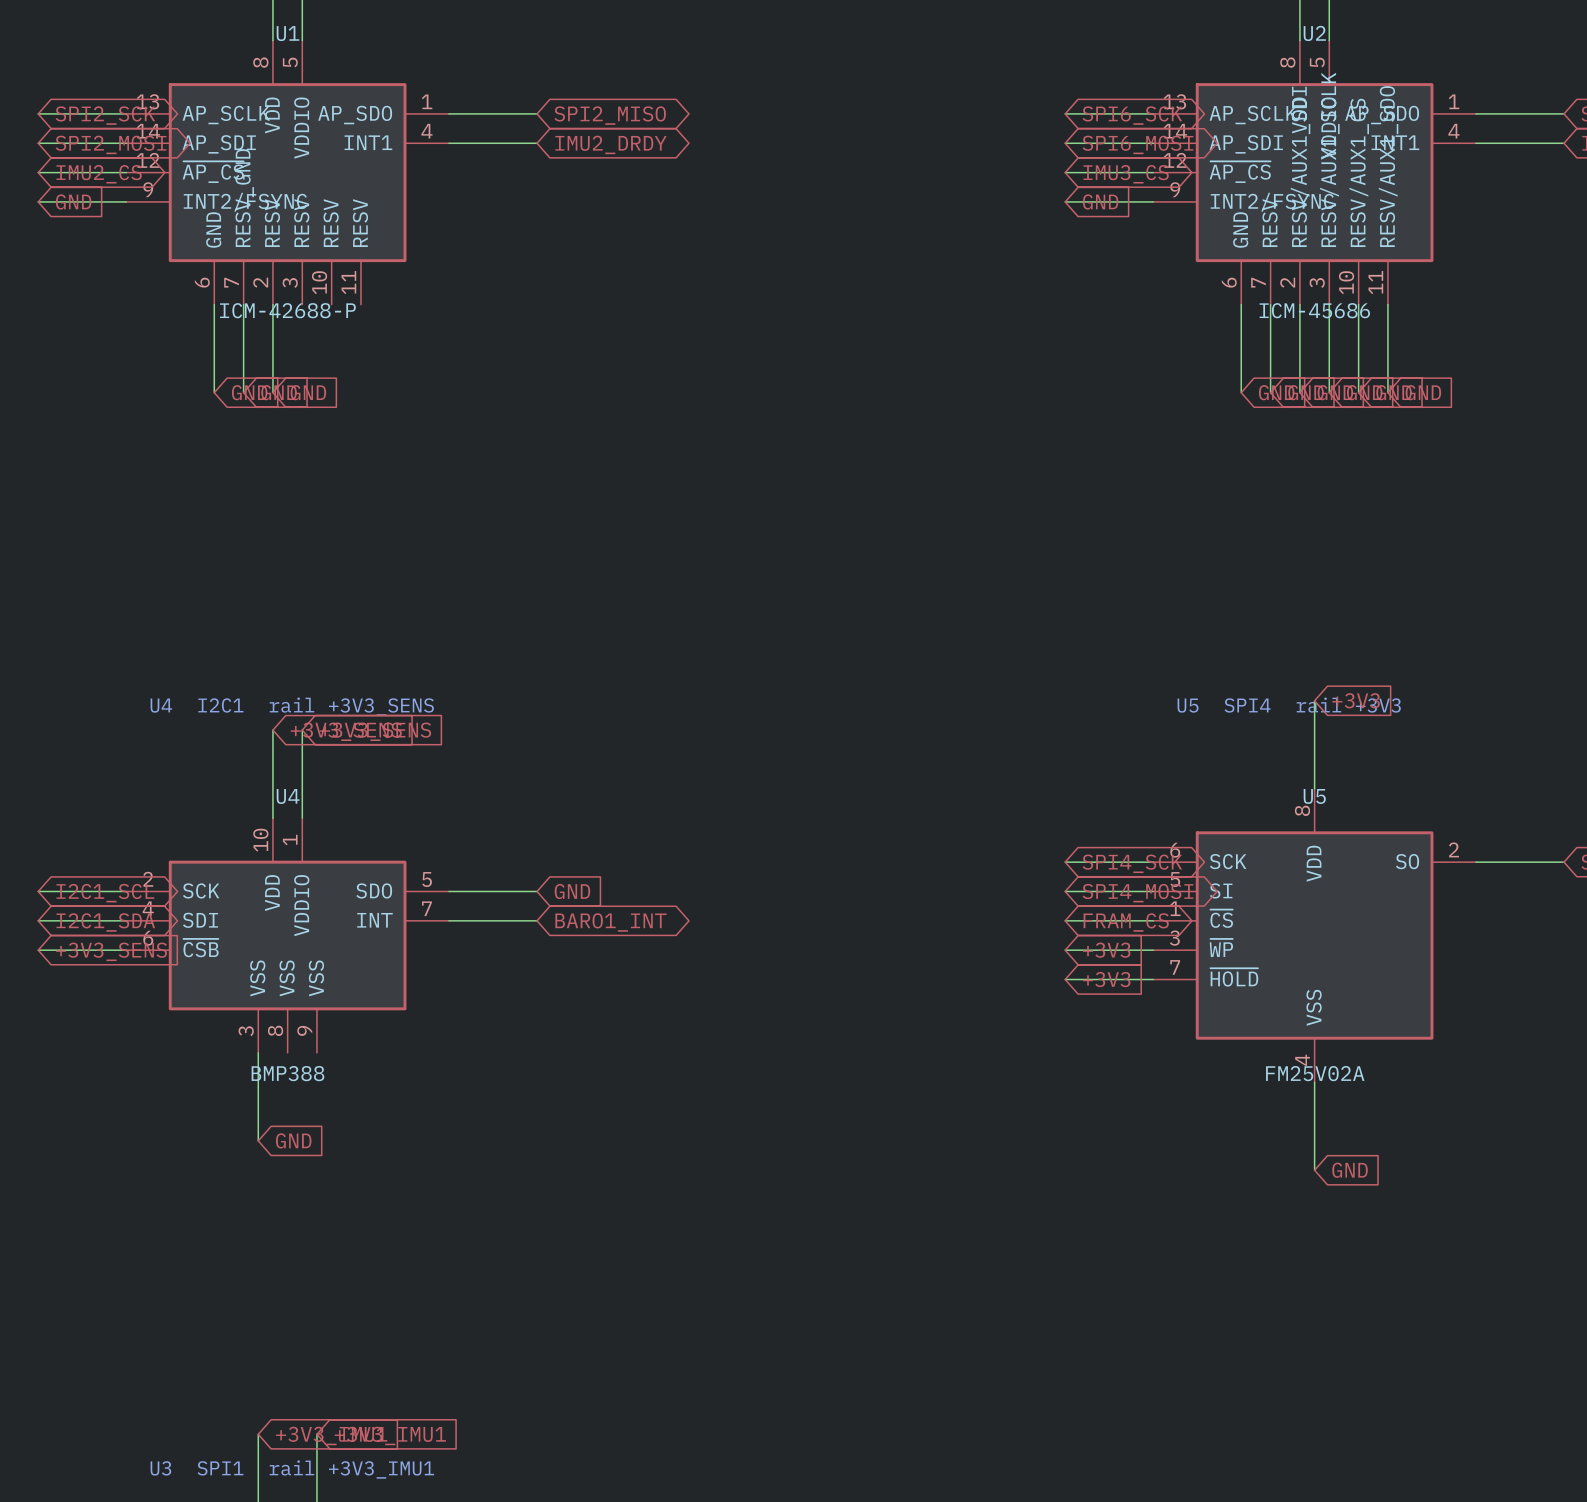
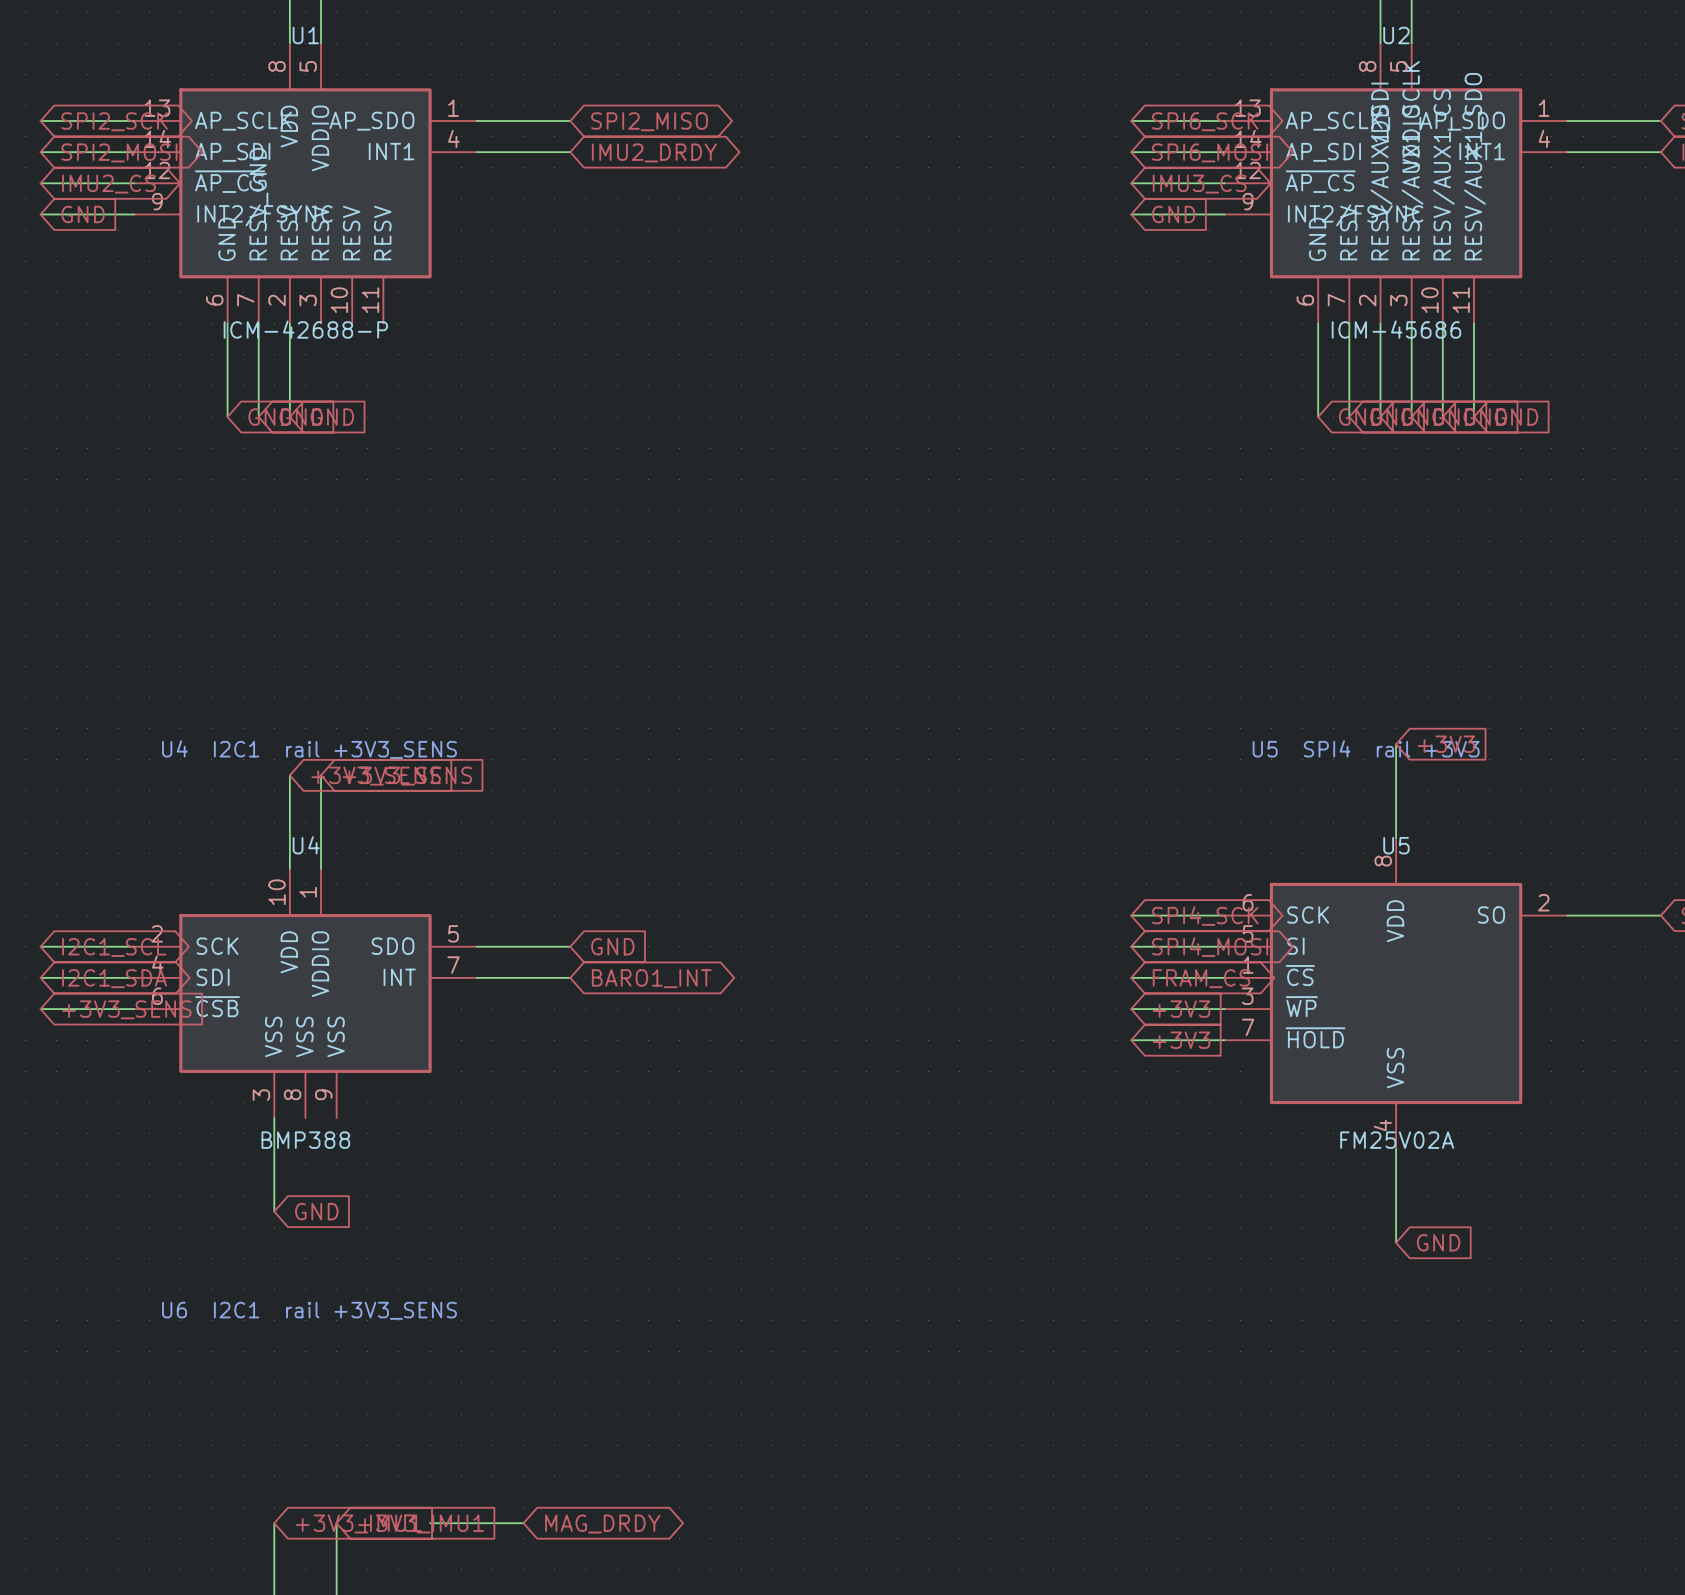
text: none -> U6 I2C1 rail +3V3_SENS (309, 1310)
wire: none -> (430, 1523) (523, 1523)
global label: none -> MAG_DRDY (602, 1523)
text: U3 SPI1 rail +3V3_IMU1 (292, 1469) -> none

